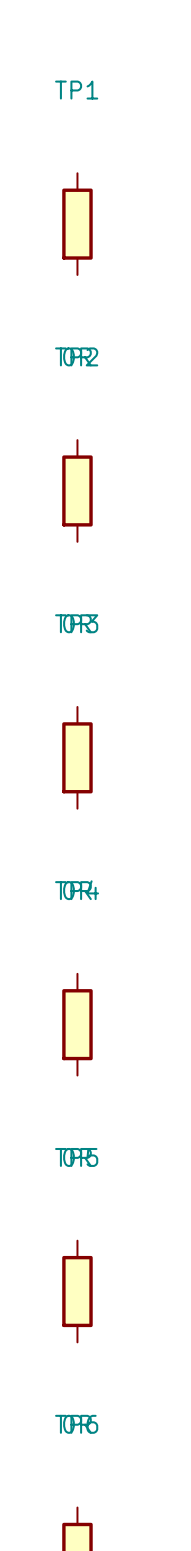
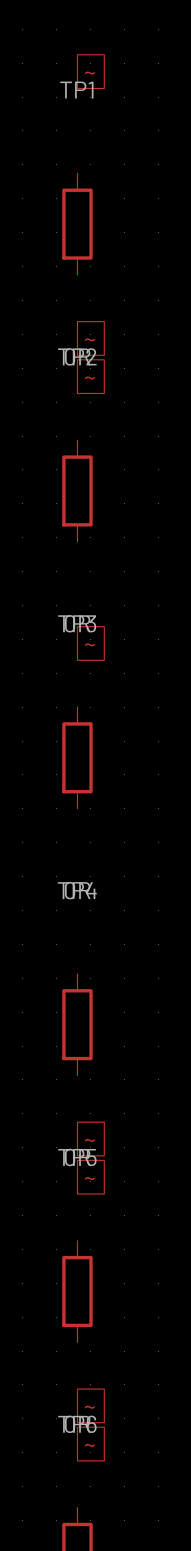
global label: none -> ~ (89, 73)
global label: none -> ~ (89, 339)
global label: none -> ~ (89, 378)
global label: none -> ~ (89, 644)
global label: none -> ~ (89, 1140)
global label: none -> ~ (89, 1178)
global label: none -> ~ (89, 1407)
global label: none -> ~ (89, 1445)

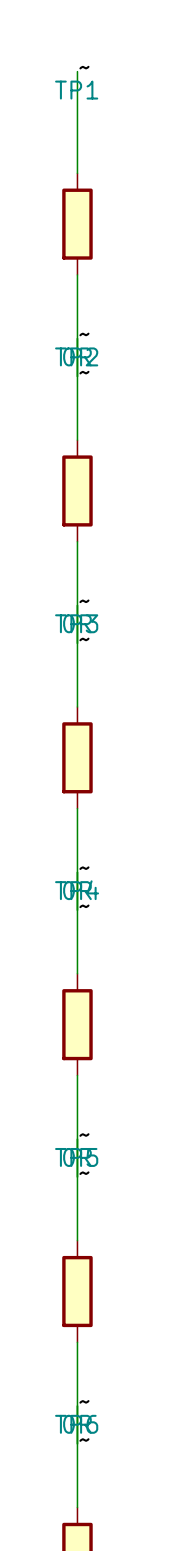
label: none -> ~ (84, 67)
wire: none -> (77, 71) (77, 173)
global label: ~ (89, 73) -> none
wire: none -> (77, 274) (77, 440)
label: none -> ~ (84, 334)
global label: ~ (89, 339) -> none
label: none -> ~ (84, 372)
global label: ~ (89, 378) -> none
wire: none -> (77, 541) (77, 706)
label: none -> ~ (84, 601)
label: none -> ~ (84, 639)
global label: ~ (89, 644) -> none
wire: none -> (77, 808) (77, 973)
label: none -> ~ (84, 868)
label: none -> ~ (84, 906)
wire: none -> (77, 1075) (77, 1240)
label: none -> ~ (84, 1135)
global label: ~ (89, 1140) -> none
label: none -> ~ (84, 1173)
global label: ~ (89, 1178) -> none
wire: none -> (77, 1342) (77, 1507)
label: none -> ~ (84, 1401)
global label: ~ (89, 1407) -> none
label: none -> ~ (84, 1440)
global label: ~ (89, 1445) -> none

